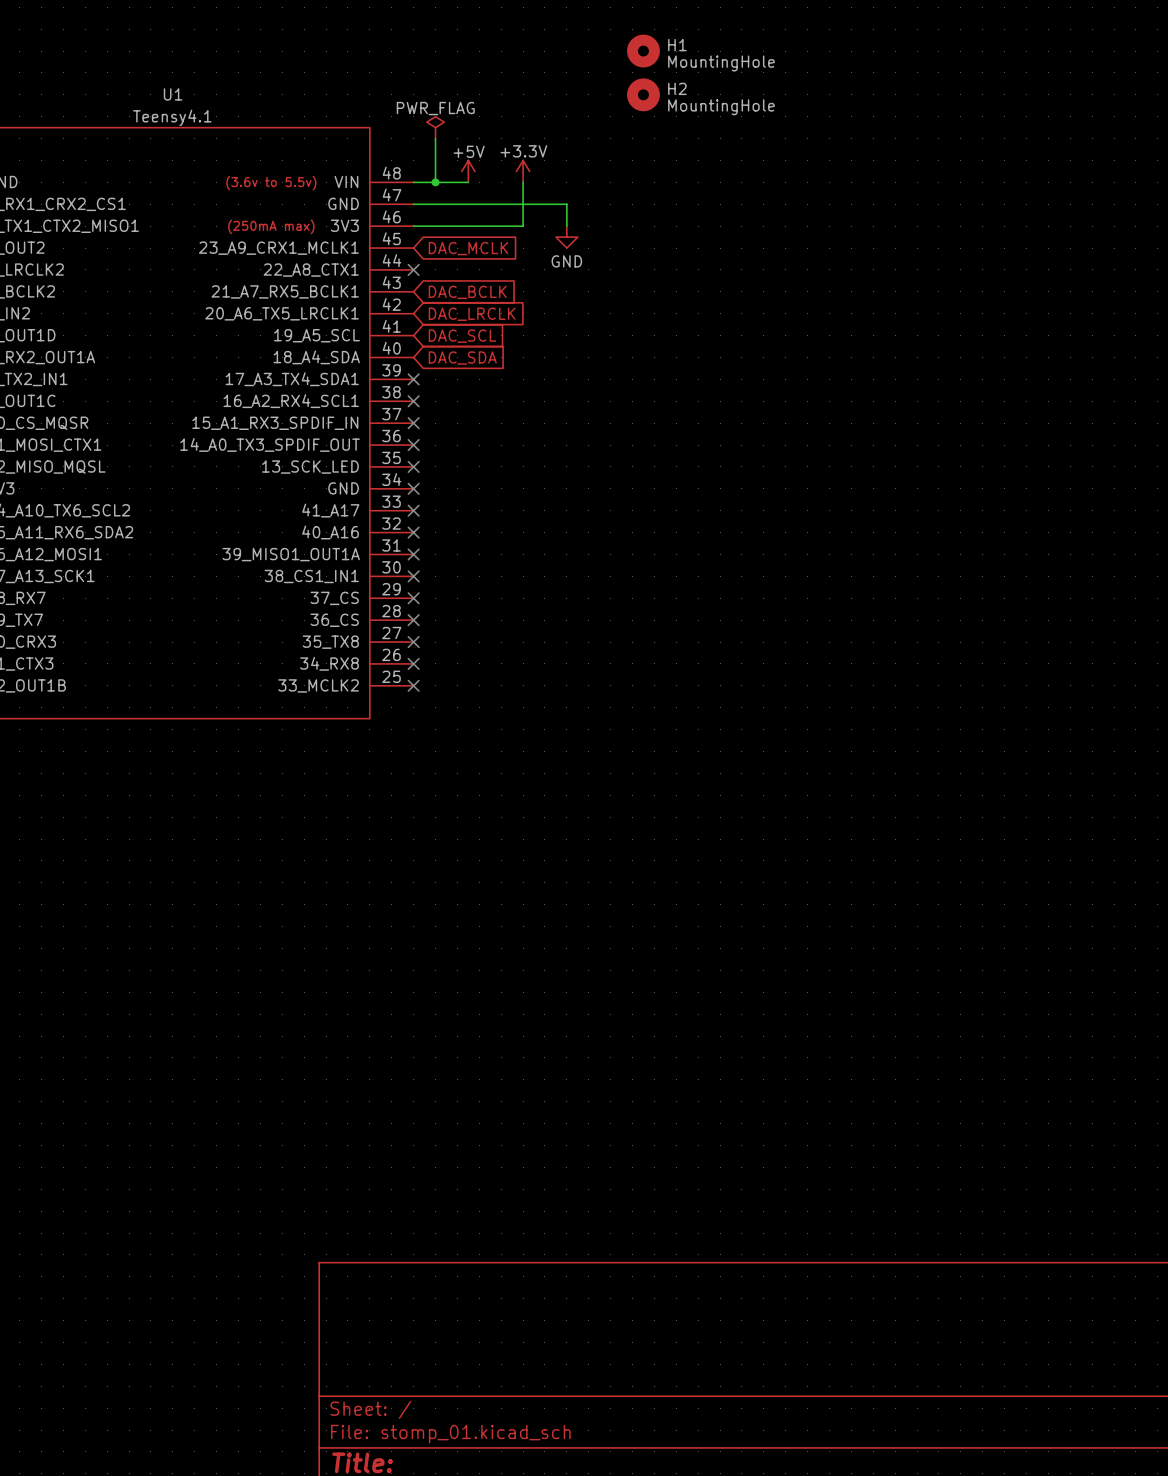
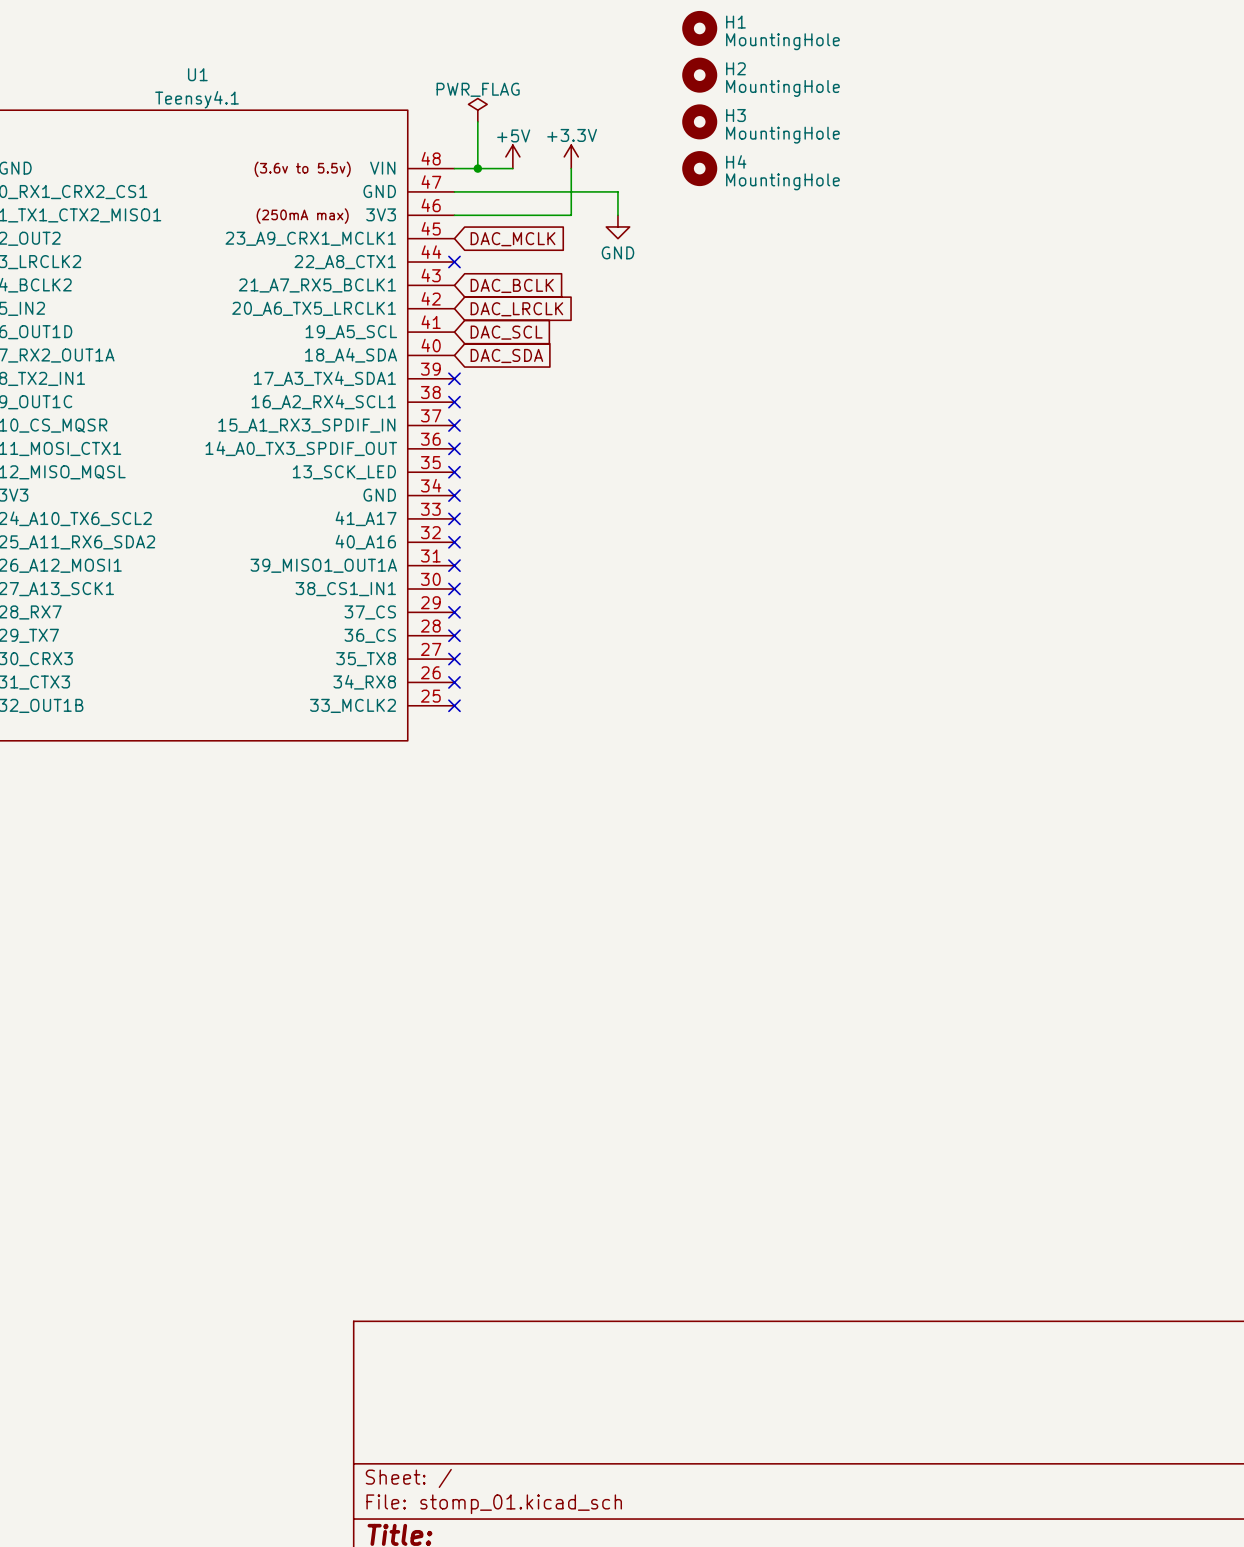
H3: none -> MountingHole (699, 121)
H4: none -> MountingHole (699, 168)

